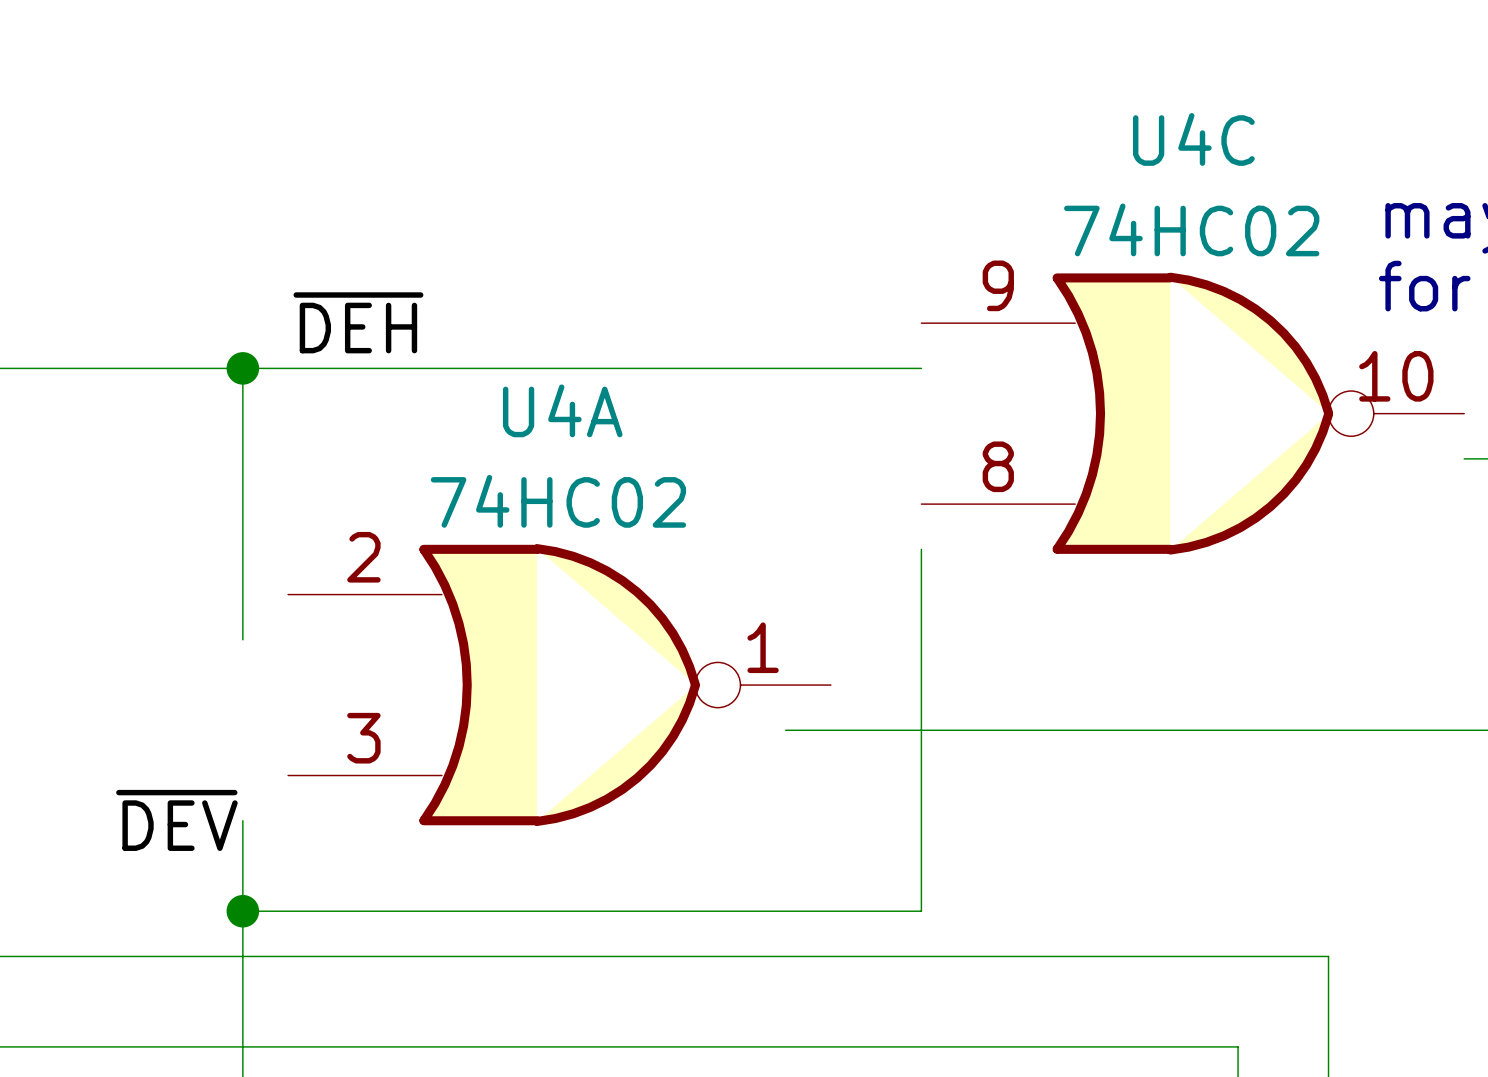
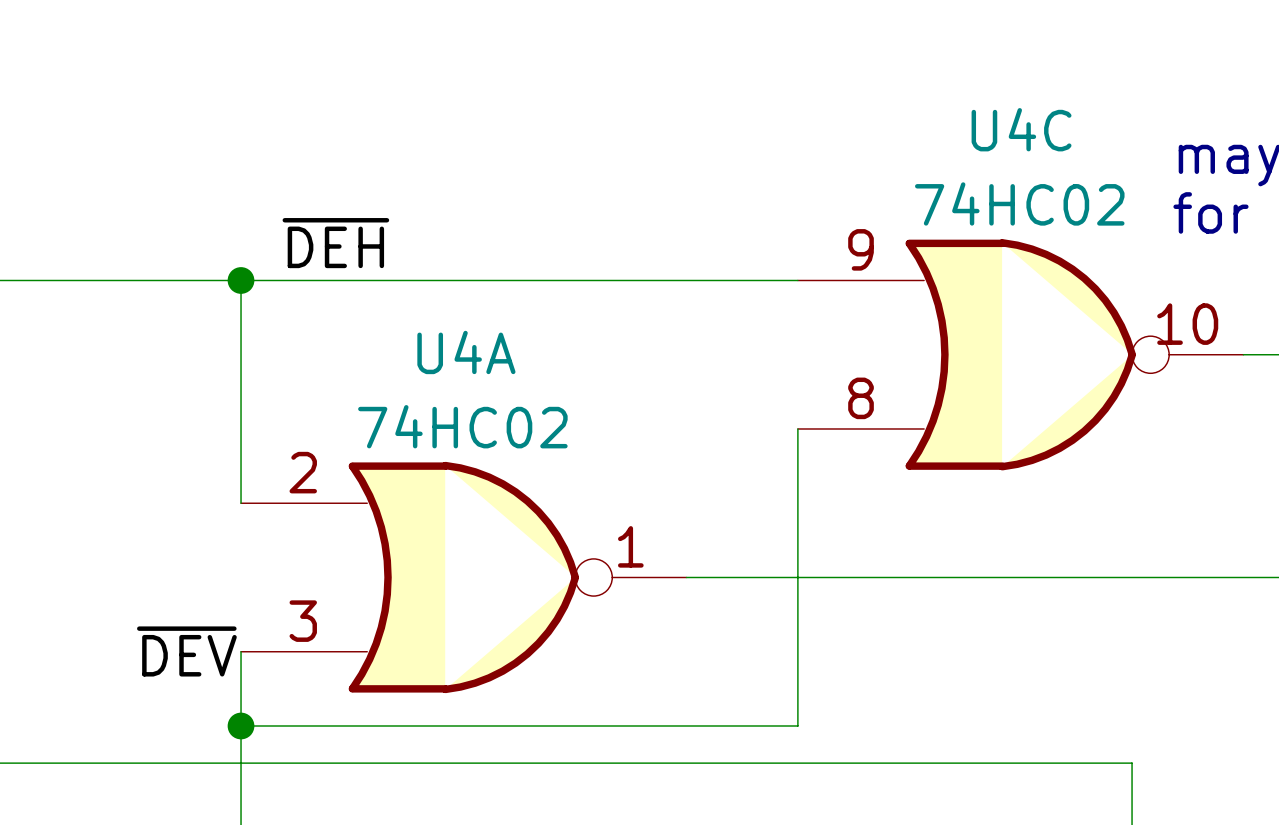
U4C position: (1192, 413) -> (1020, 354)
U4A position: (559, 685) -> (463, 577)

